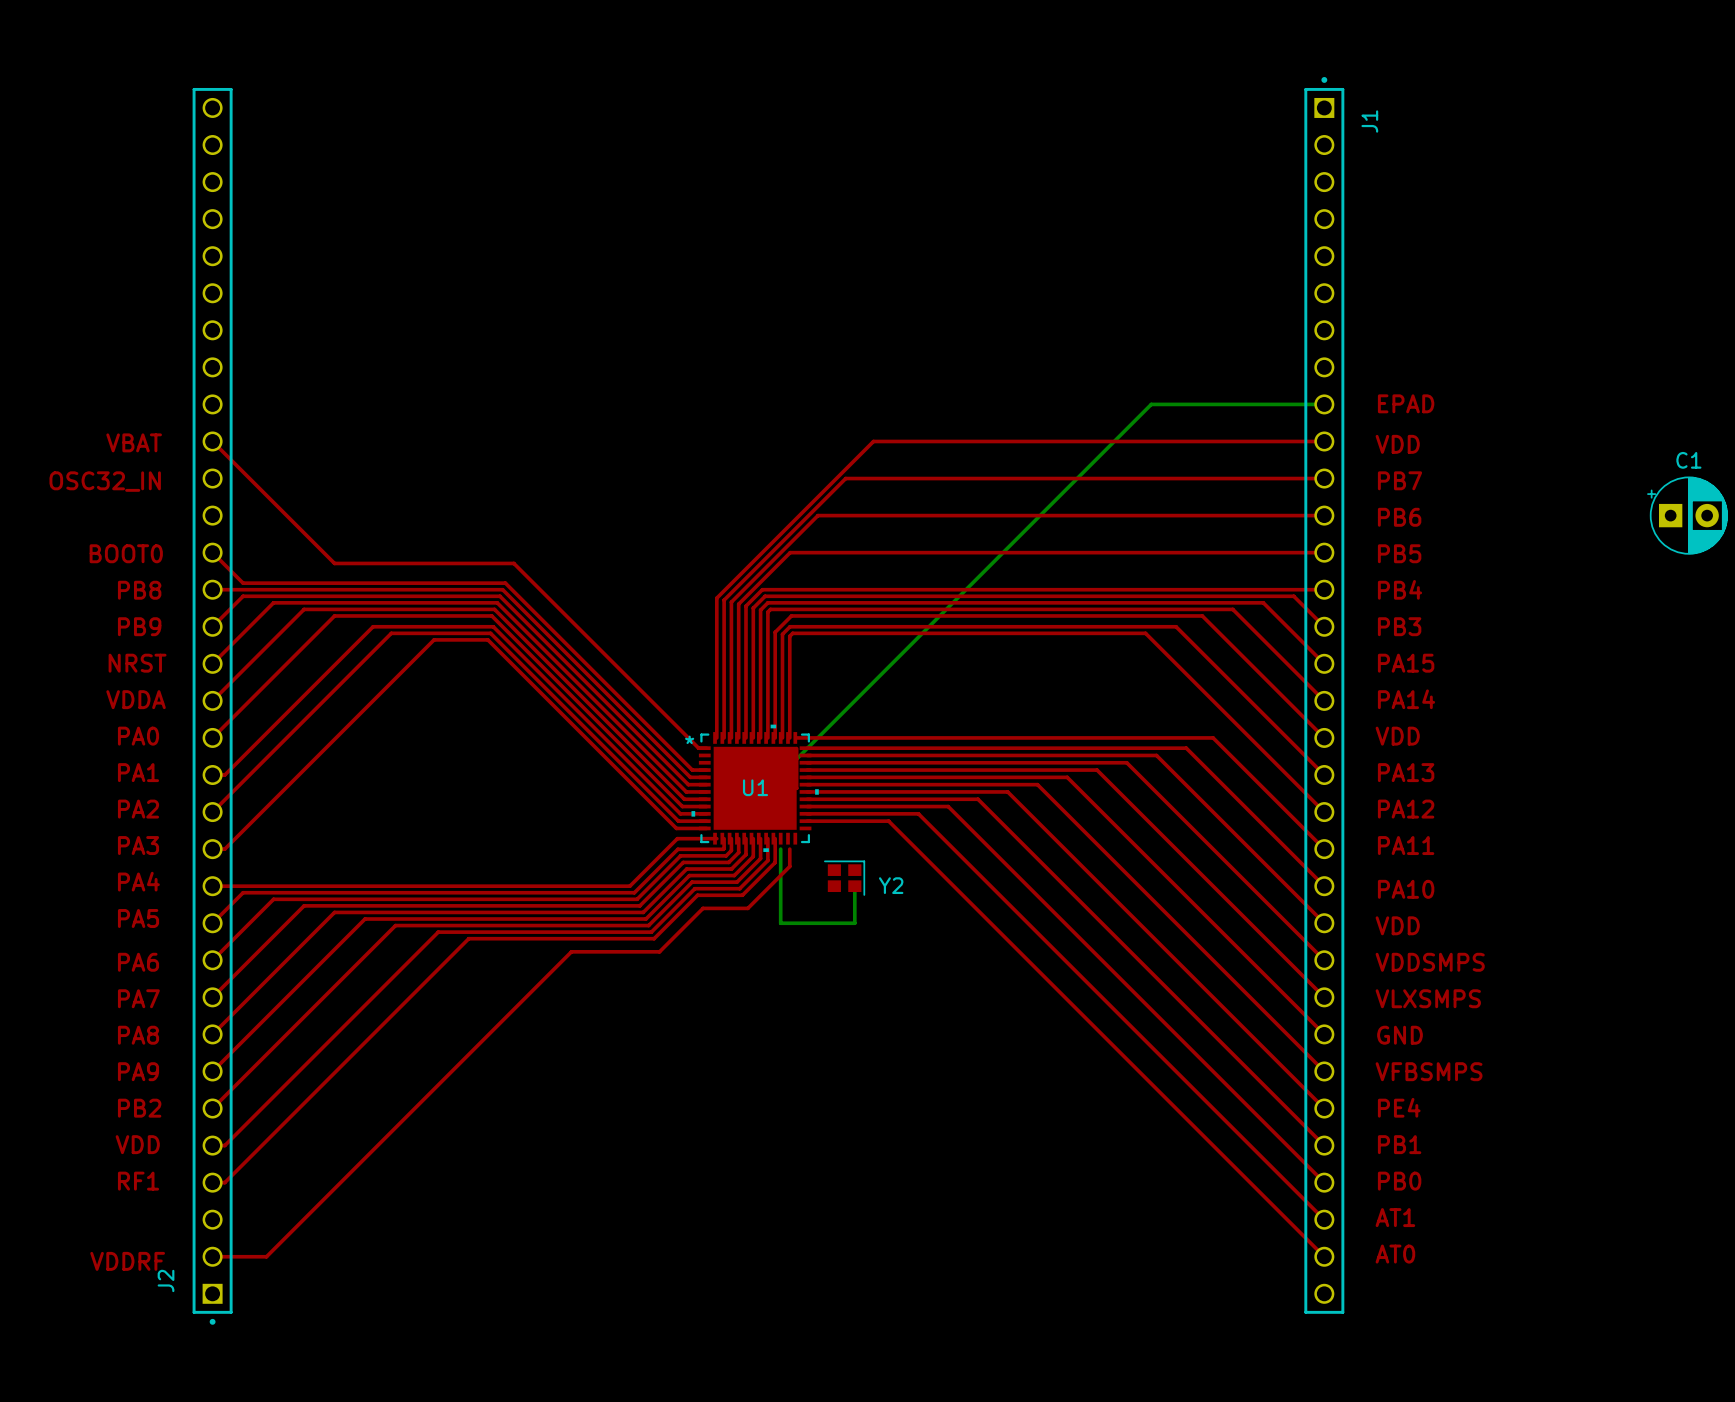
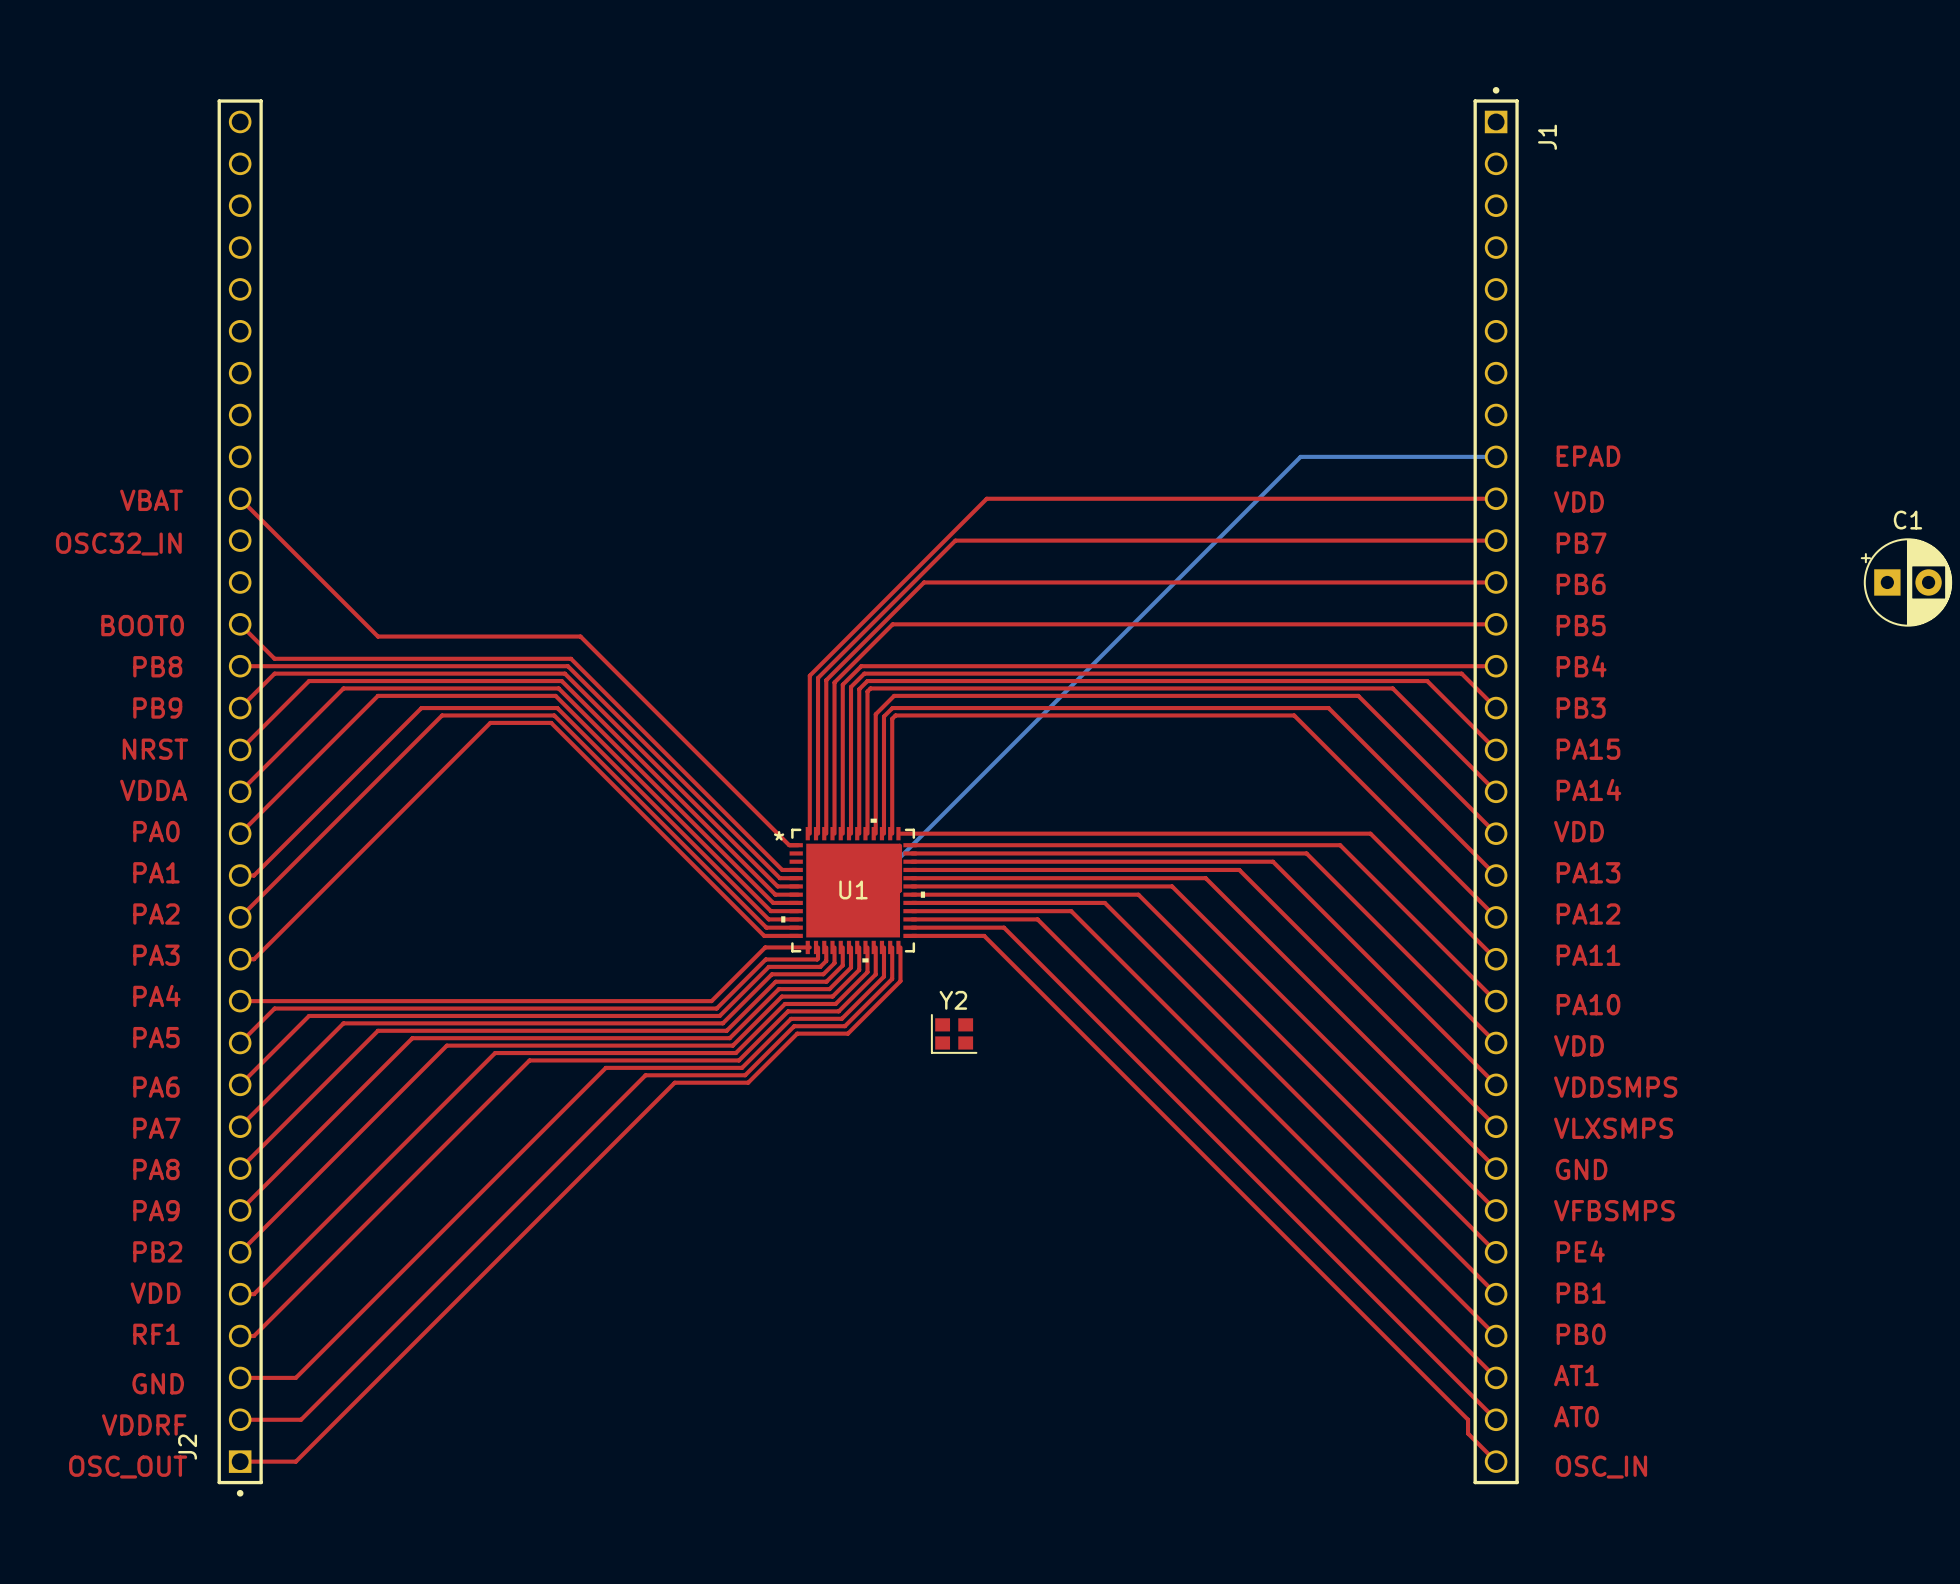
top track: none -> (912, 935) (984, 935) (1468, 1419) (1468, 1433) (1496, 1461)
top track: none -> (883, 947) (883, 976) (841, 1018) (791, 1018) (742, 1067) (605, 1067) (295, 1377) (240, 1377)
top track: none -> (892, 947) (892, 959)
top track: none -> (900, 947) (900, 981) (847, 1033) (797, 1033) (748, 1082) (674, 1082) (295, 1461) (240, 1461)
bottom track: (780, 849) (780, 923) (854, 923) (854, 886) -> none
Y2 rotation: 0° (844, 878) -> 180° (954, 1033)
Y2 position: (844, 878) -> (954, 1033)
Y2 name position: Y2 (891, 885) -> Y2 (953, 1000)
text: none -> GND (158, 1383)
text: none -> OSC_OUT (128, 1467)
text: none -> OSC_IN (1601, 1467)

